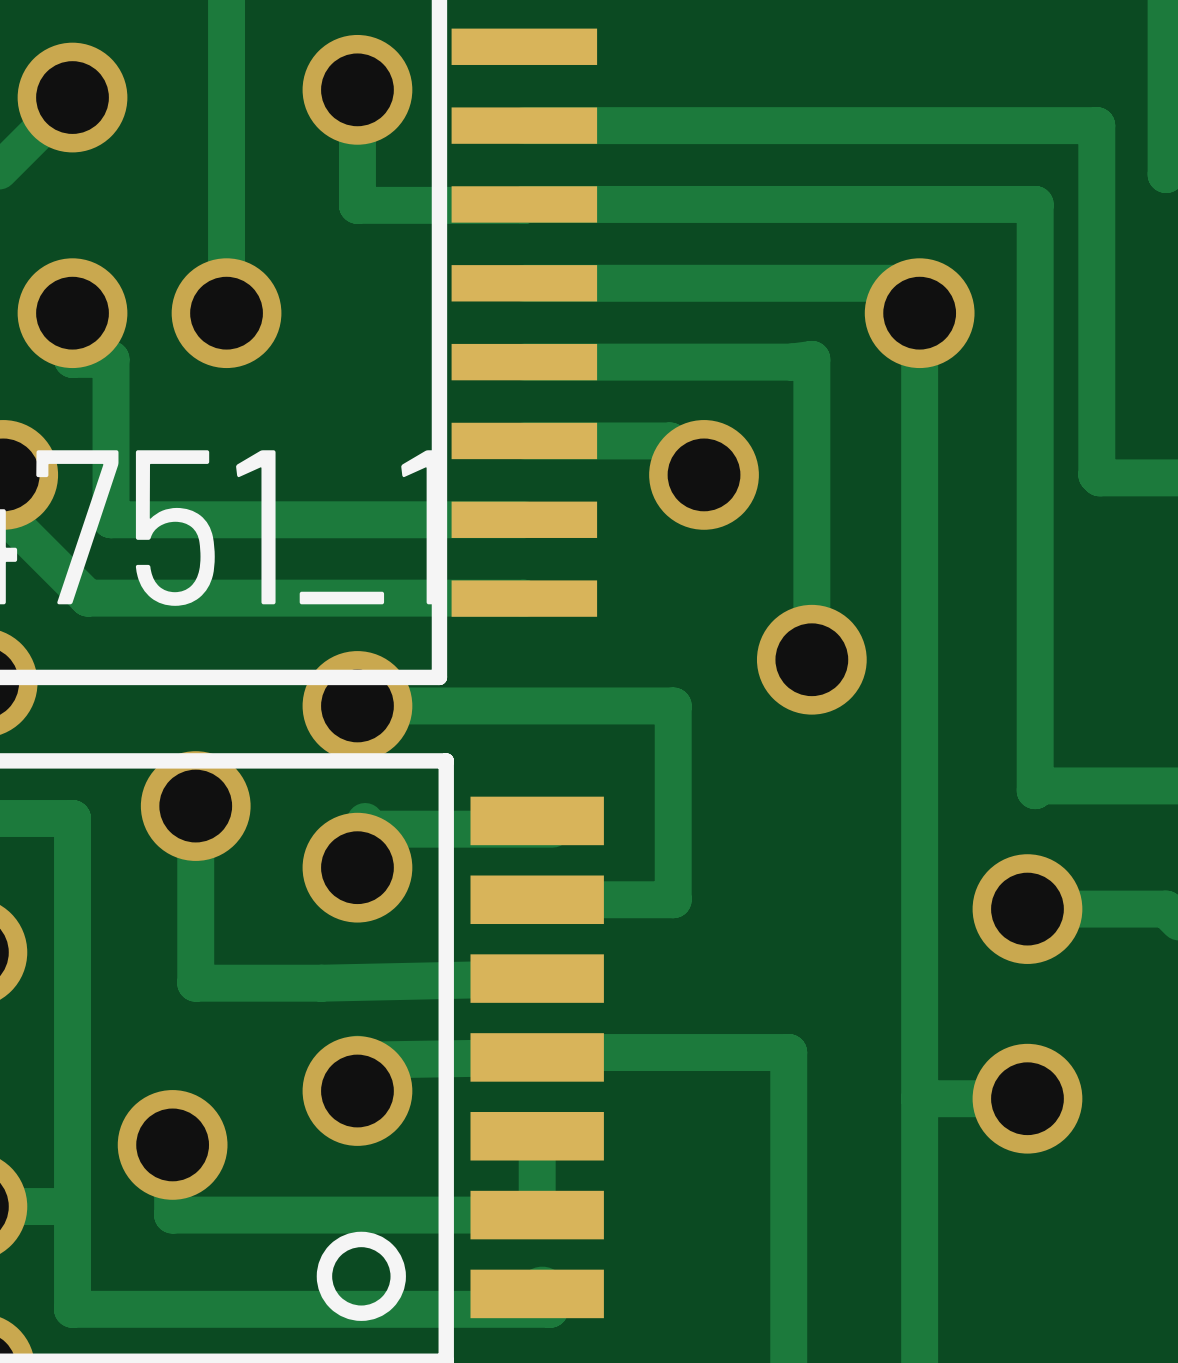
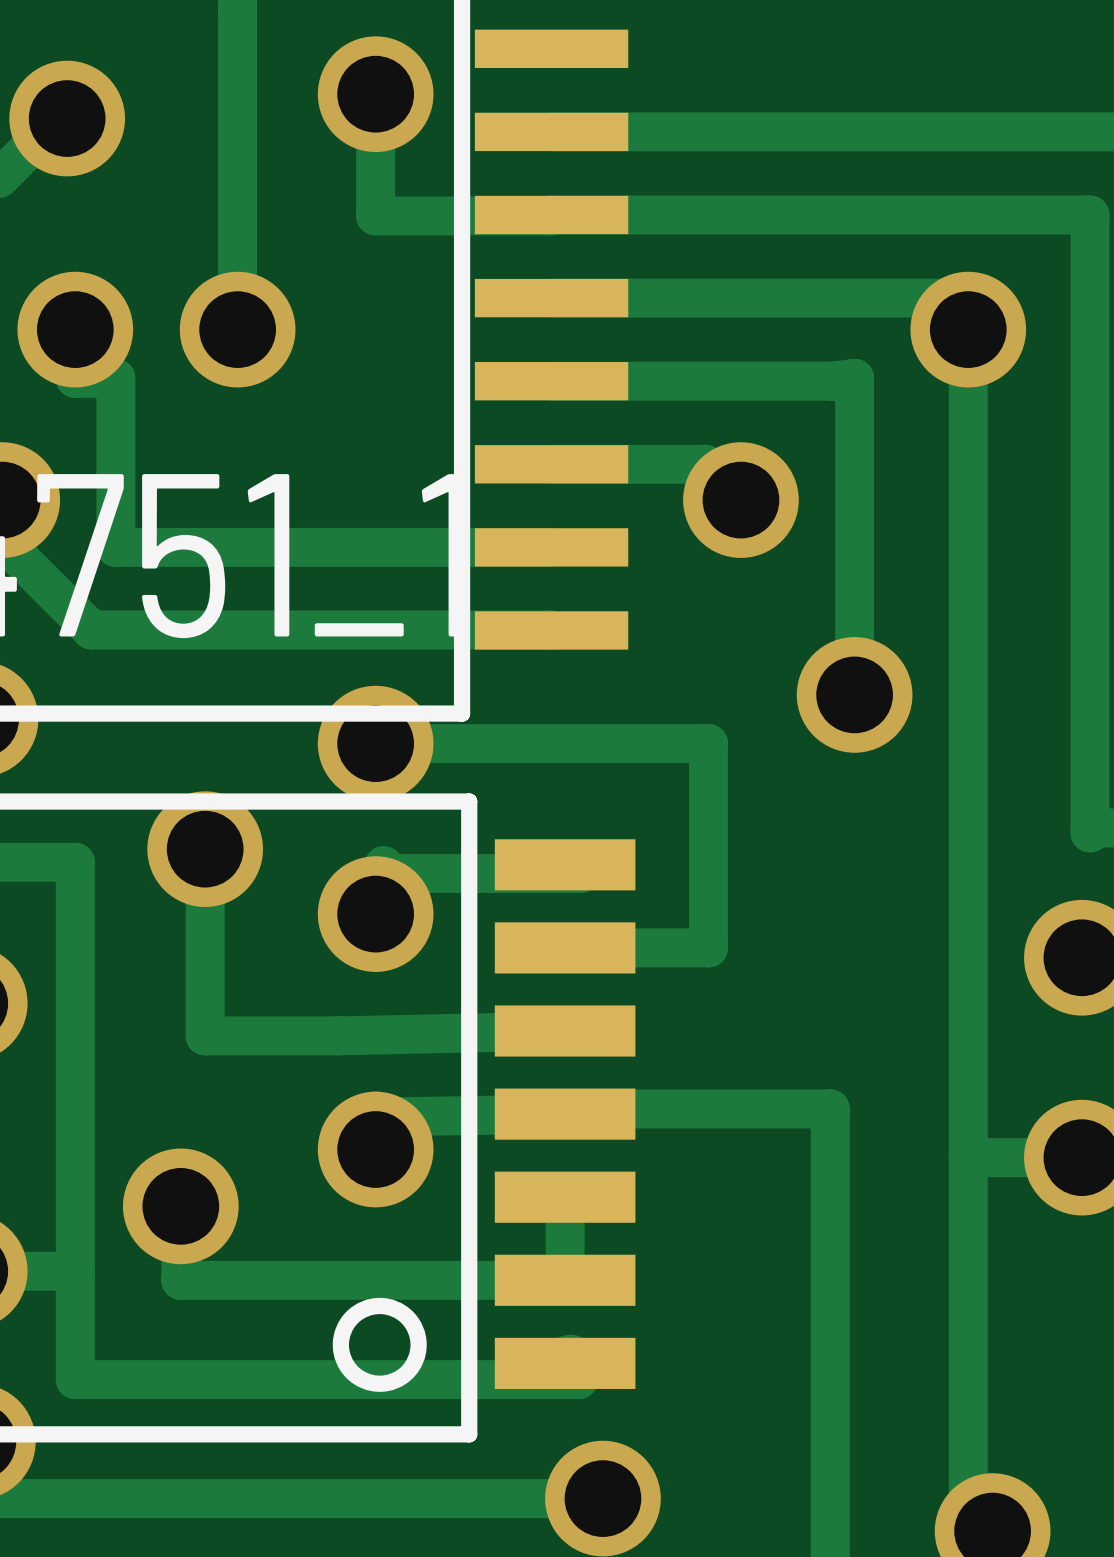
via position: (72, 97) -> (67, 118)

